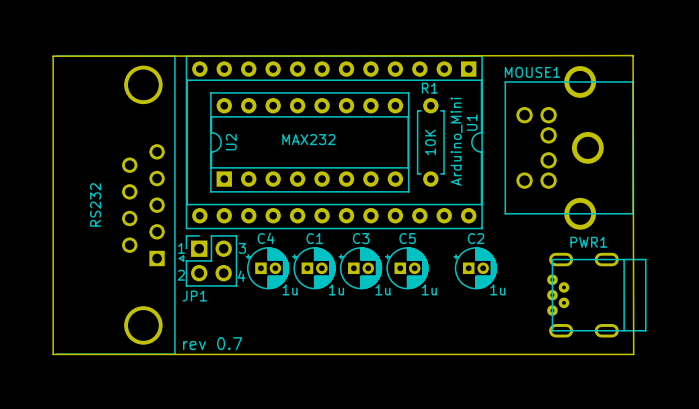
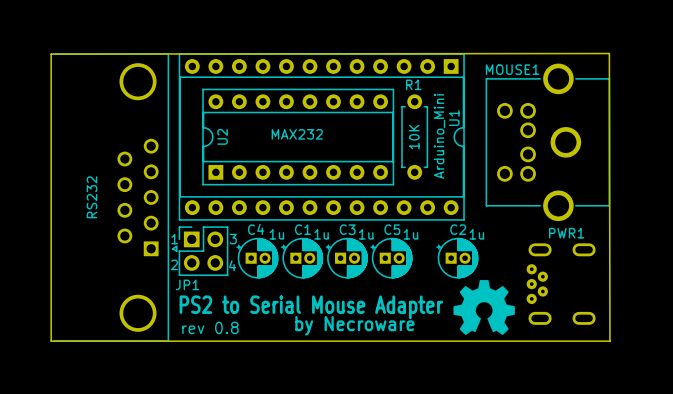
MOUSE1 footprint: [504, 66, 634, 230] -> [485, 63, 610, 222]
PWR1 footprint: [547, 252, 647, 338] -> [526, 243, 596, 325]
C4 value position: 1u (290, 289) -> 1u (276, 234)
C1 value position: 1u (336, 289) -> 1u (321, 234)
C3 value position: 1u (382, 289) -> 1u (366, 234)
C5 value position: 1u (429, 289) -> 1u (410, 234)
C2 value position: 1u (497, 289) -> 1u (476, 234)
drawing: none -> [453, 280, 515, 335]
text: none -> PS2 to Serial Mouse Adapter (311, 307)
text: none -> by Necroware (354, 325)
text: rev 0.7 (212, 343) -> rev 0.8 (210, 327)

